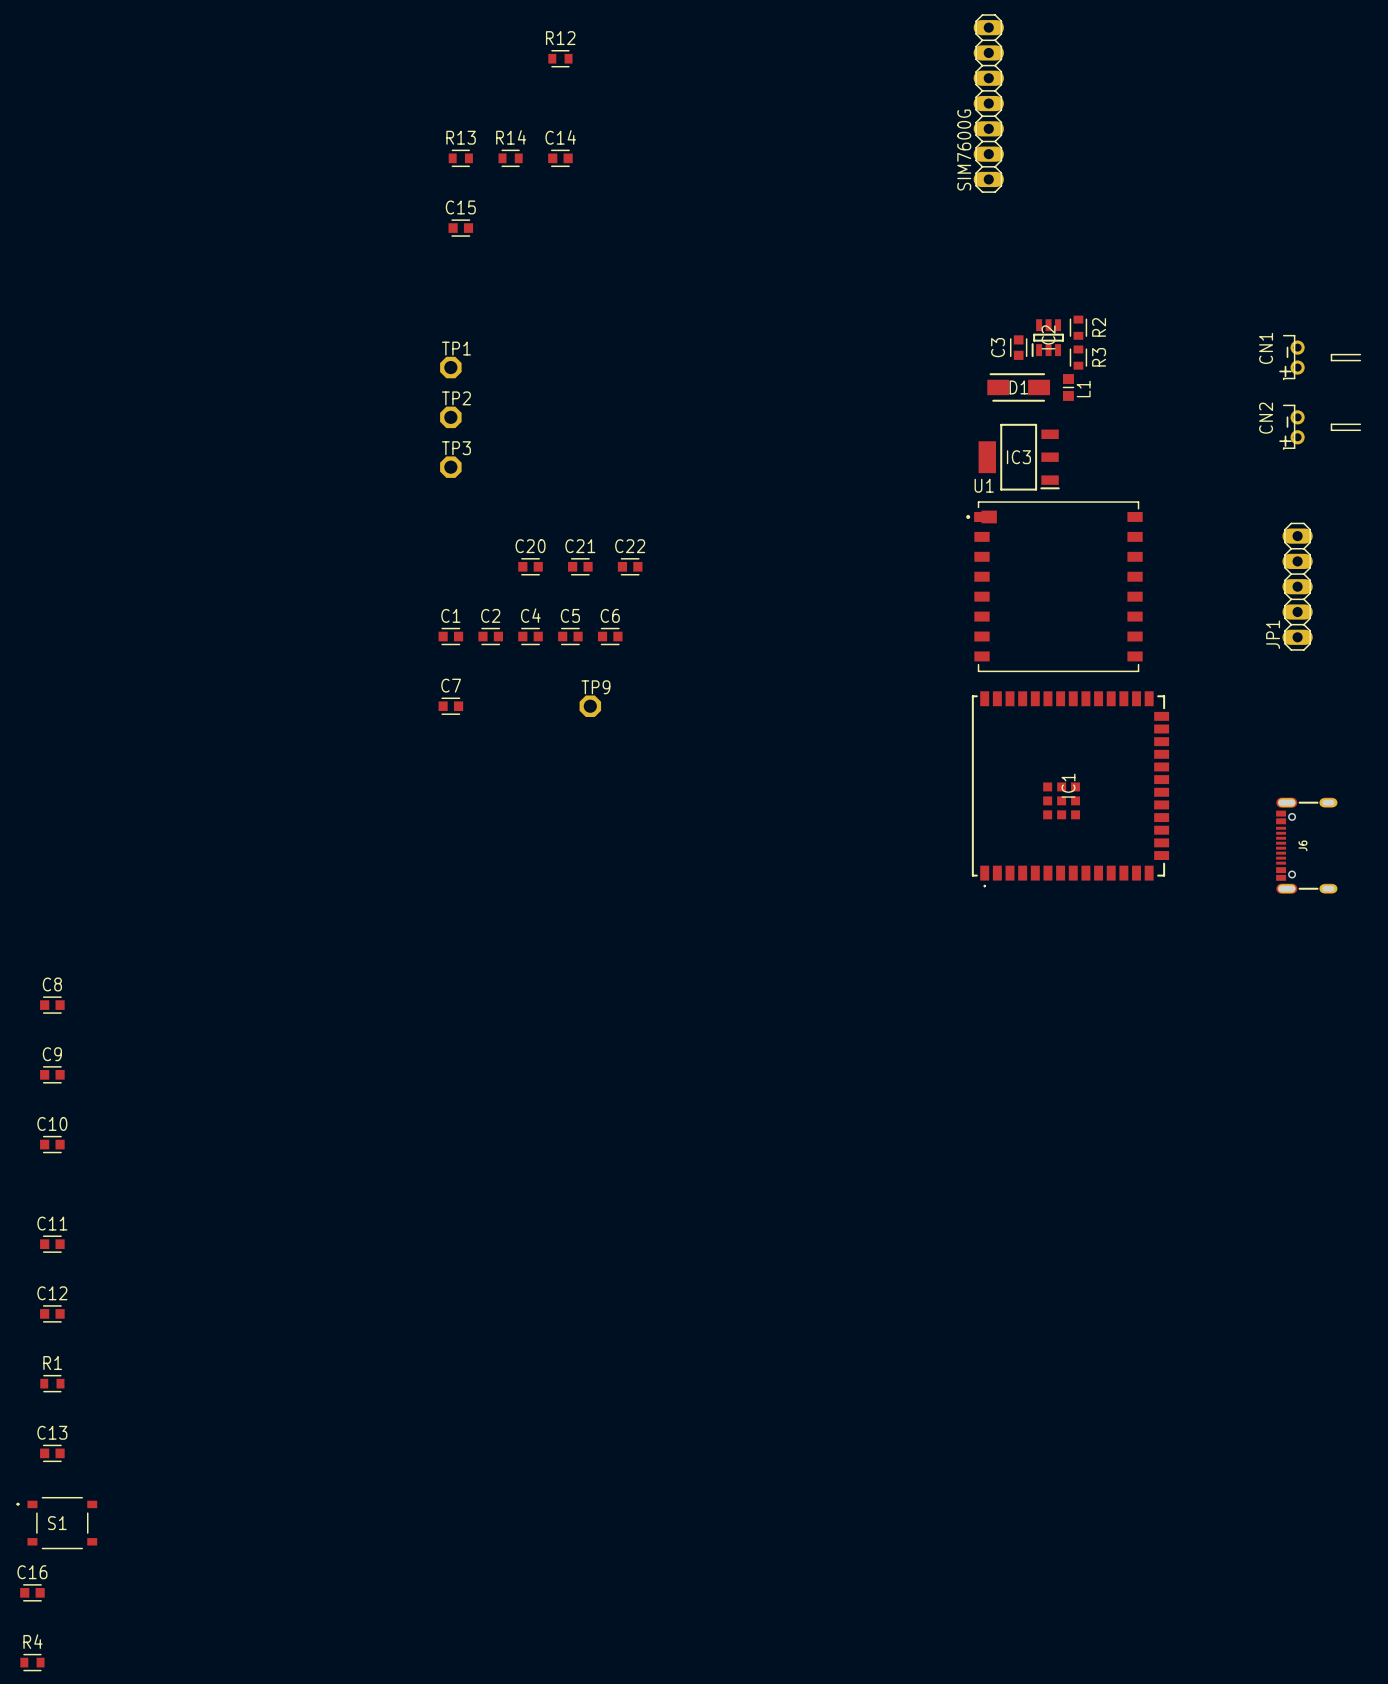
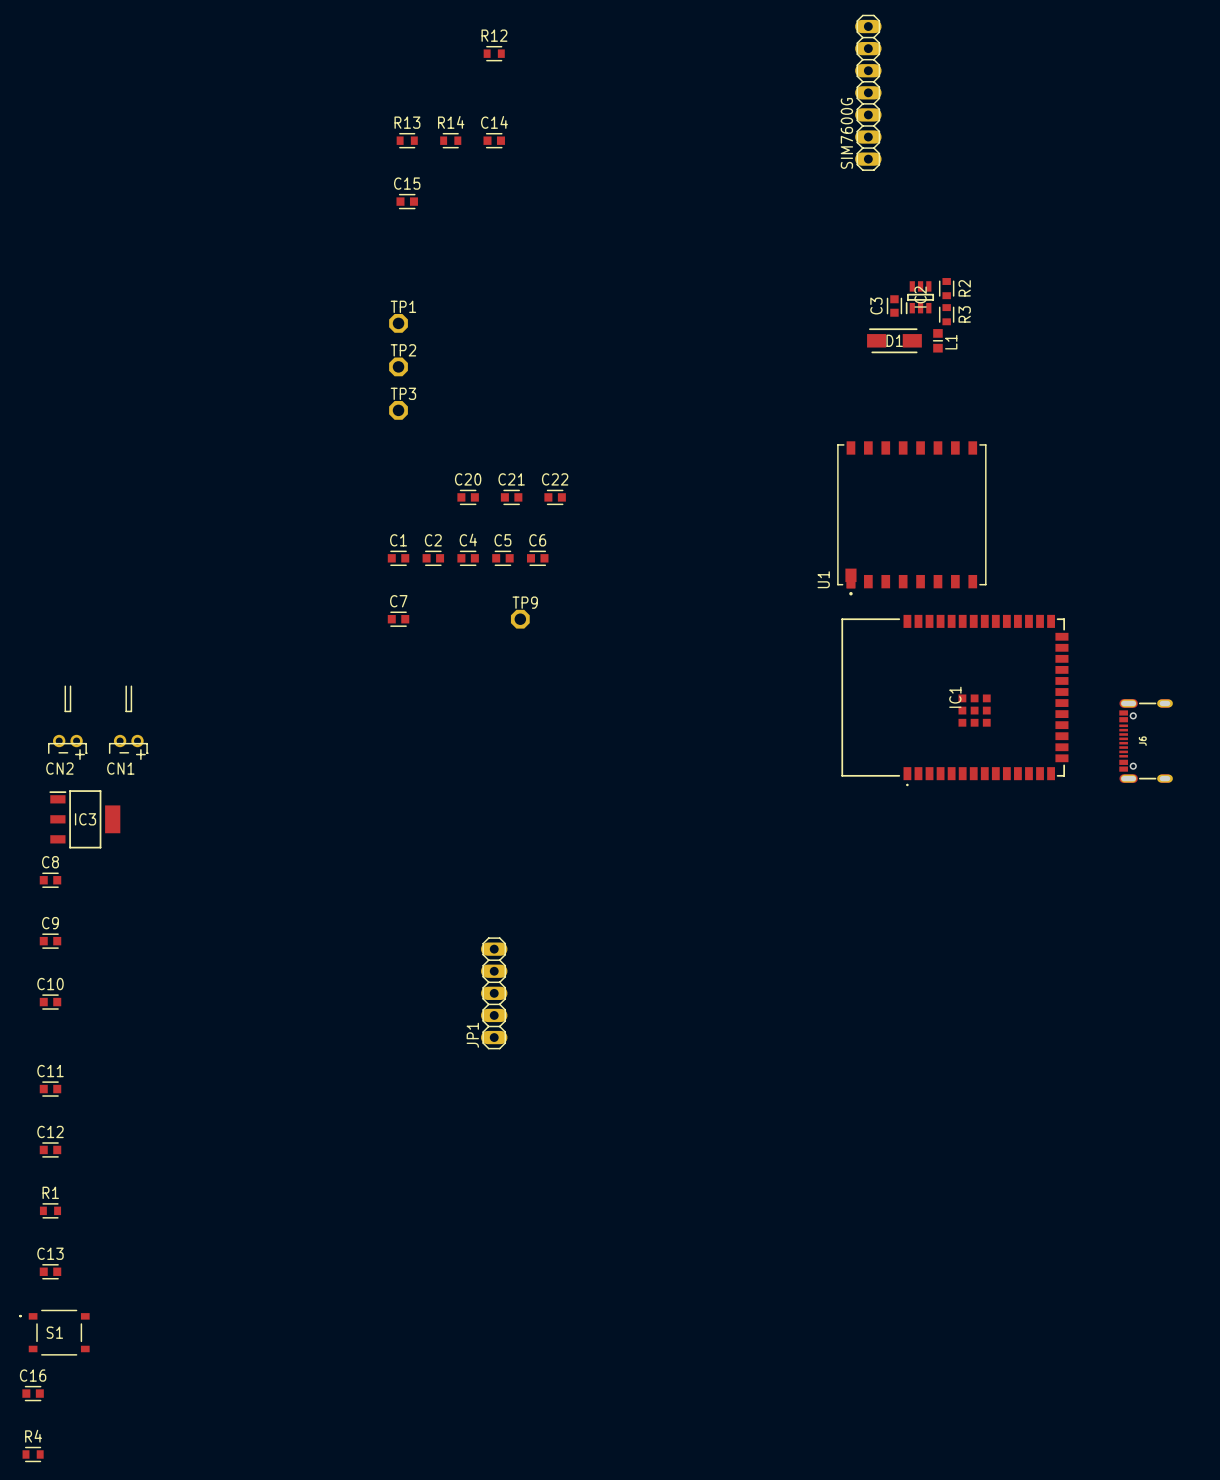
CN1 footprint: [1283, 335, 1361, 381] -> [109, 685, 149, 754]
CN1 name position: CN1 (1266, 348) -> CN1 (120, 768)
CN2 footprint: [1283, 404, 1361, 450] -> [48, 685, 88, 754]
CN2 name position: CN2 (1266, 418) -> CN2 (59, 768)
IC3 rotation: 0° (1019, 457) -> 180° (84, 819)
IC3 position: (1019, 457) -> (84, 819)
U1 rotation: 0° (1054, 586) -> 90° counterclockwise (911, 518)
JP1 position: (1297, 586) -> (494, 993)
IC1 footprint: [971, 691, 1170, 888] -> [841, 614, 1069, 786]

